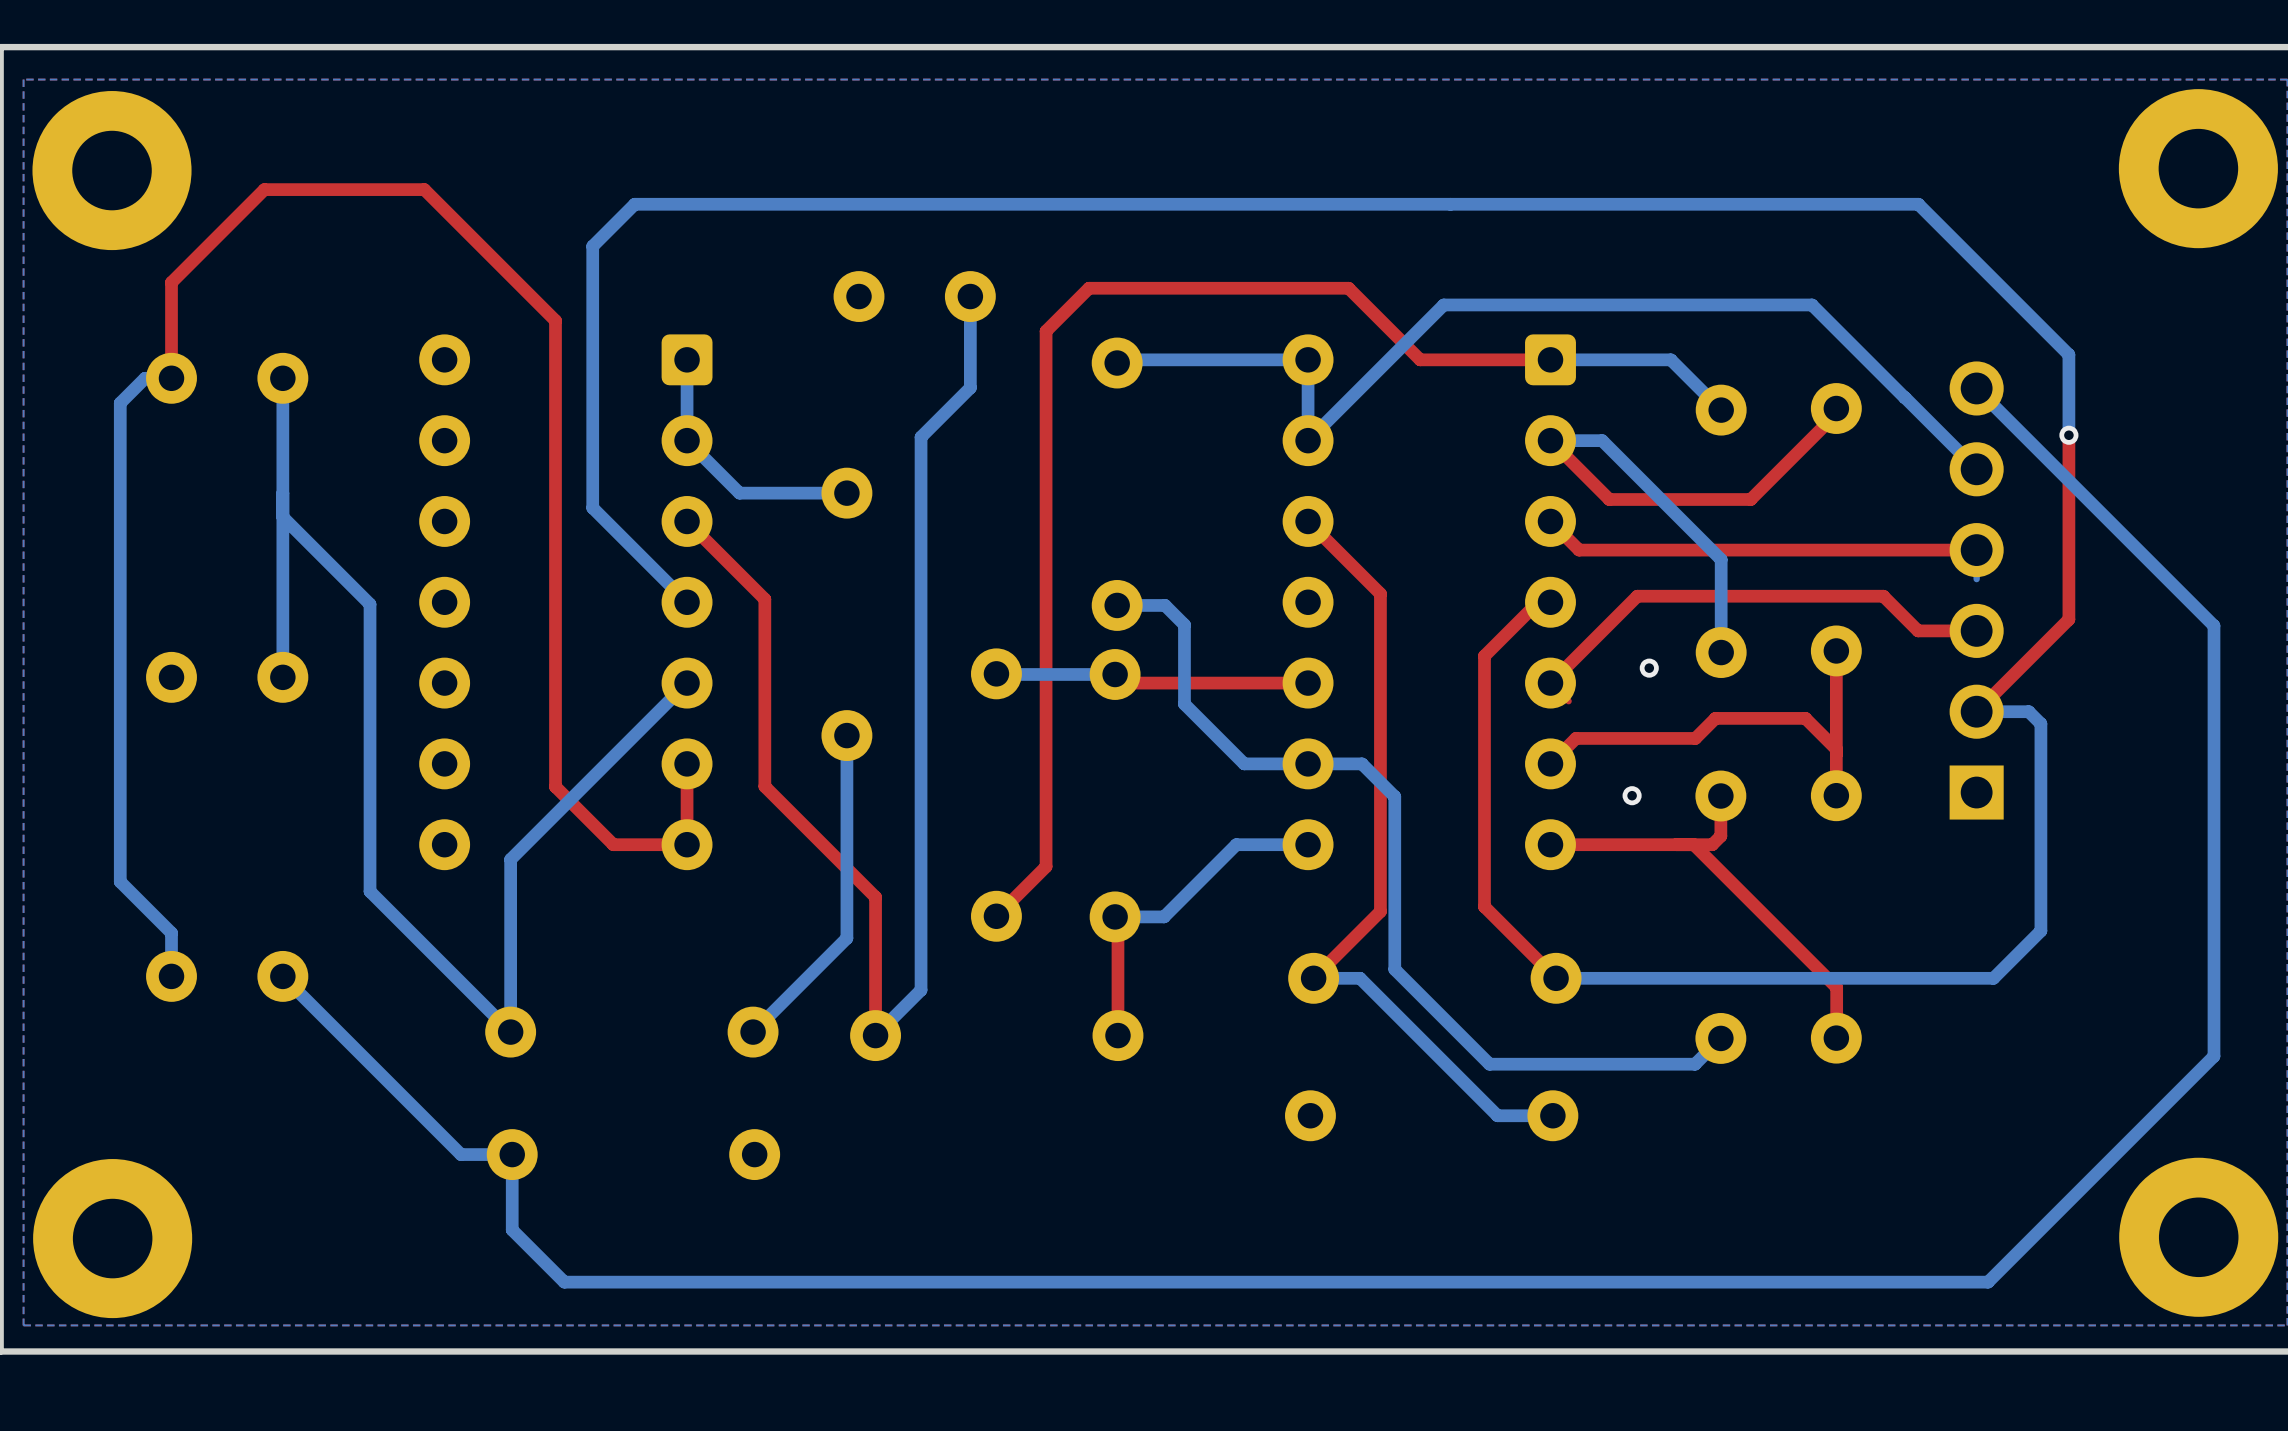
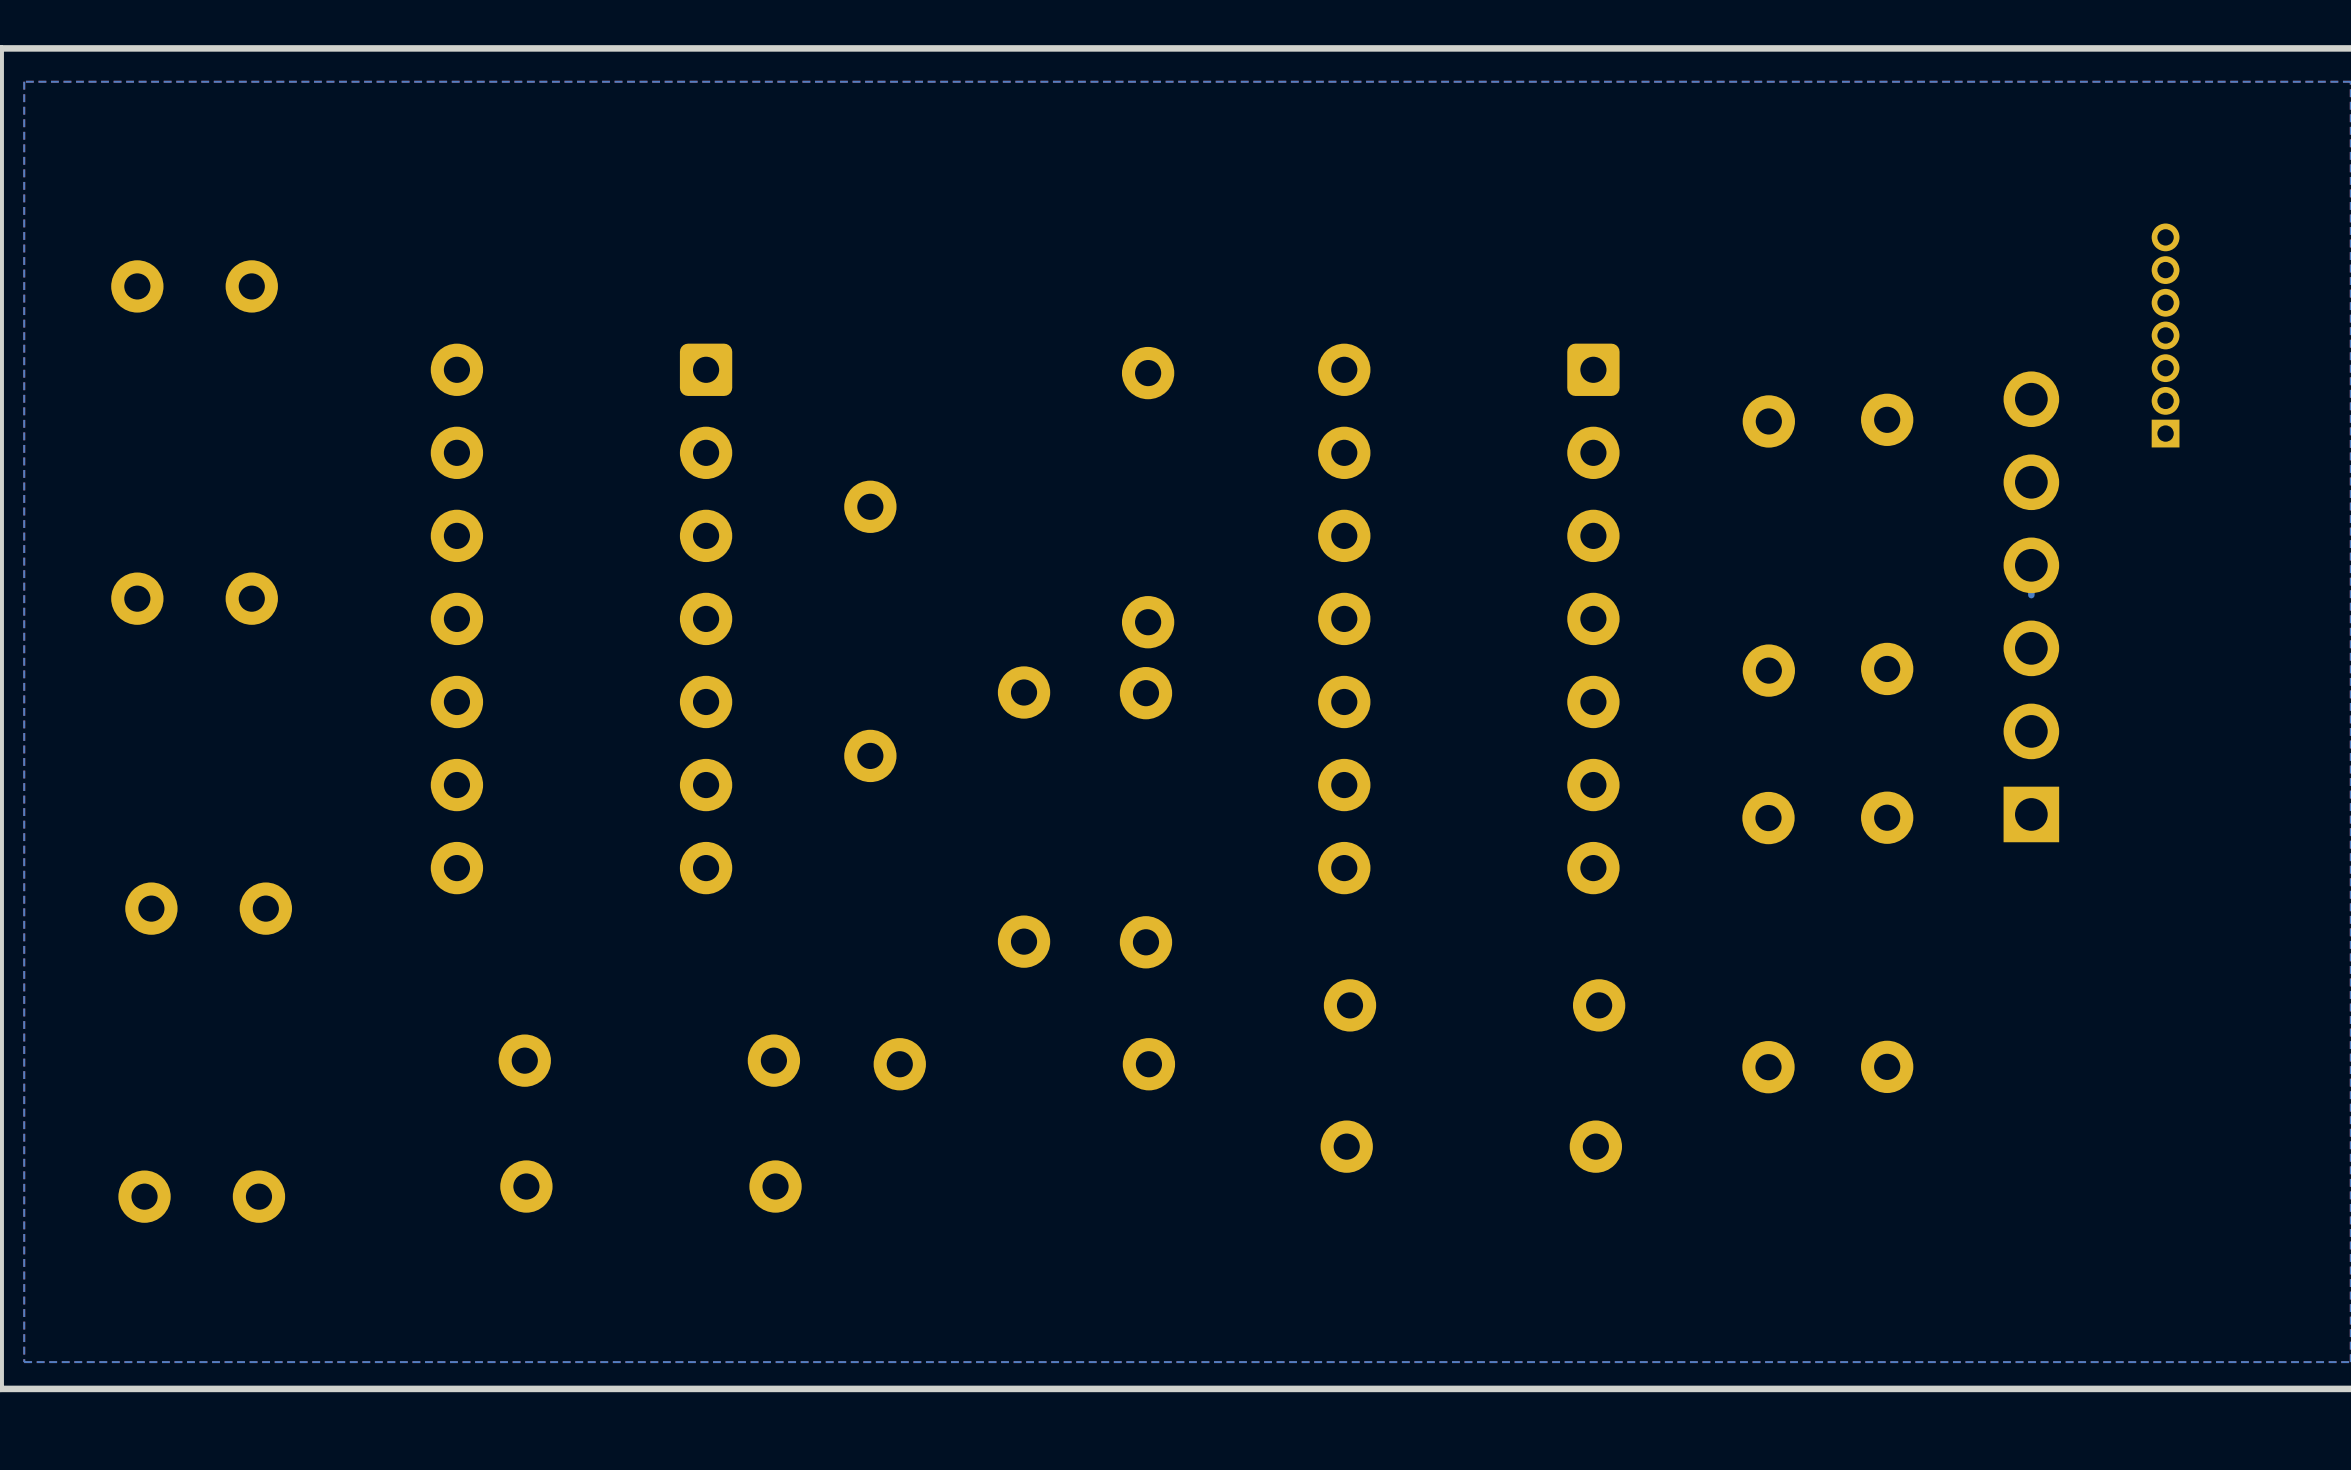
part: (2198, 168) -> none
part: (112, 170) -> none
part: none -> (194, 286)
part: (914, 296) -> none
bottom track: (970, 296) (970, 387) (921, 437) (921, 990) (875, 1035) -> none
part: none -> (2165, 335)
bottom track: (687, 359) (687, 440) (739, 493) (846, 493) -> none
top track: (1550, 359) (1420, 359) (1348, 288) (1089, 288) (1046, 331) (1046, 866) (996, 916) -> none
bottom track: (1550, 359) (1670, 359) (1721, 410) -> none
bottom track: (1117, 363) (1120, 359) (1308, 359) (1308, 440) (1443, 304) (1812, 304) (1904, 397) -> none
top track: (171, 378) (171, 282) (264, 189) (424, 189) (555, 320) (555, 786) (613, 844) (687, 844) (687, 763) -> none
bottom track: (171, 378) (145, 378) (120, 403) (120, 881) (171, 933) (171, 976) -> none
part: (227, 378) -> none
bottom track: (282, 378) (282, 677) -> none
bottom track: (1976, 388) (2213, 625) (2213, 1056) (1988, 1282) (564, 1282) (512, 1229) (512, 1154) (461, 1154) (282, 976) -> none
bottom track: (1905, 397) (1976, 469) -> none
top track: (1840, 409) (1750, 499) (1609, 499) (1550, 440) -> none
top track: (2068, 435) (2068, 619) (1976, 711) -> none
bottom track: (2068, 435) (2068, 354) (1918, 204) (634, 204) (592, 246) (592, 507) (687, 602) -> none
via: (2068, 435) -> none
bottom track: (1550, 440) (1602, 440) (1721, 559) (1721, 652) -> none
bottom track: (282, 517) (370, 604) (370, 891) (510, 1032) (510, 859) (687, 683) -> none
top track: (687, 521) (764, 599) (764, 786) (875, 897) (875, 1035) -> none
top track: (1308, 521) (1380, 593) (1380, 911) (1313, 978) -> none
top track: (1550, 521) (1579, 550) (1976, 550) -> none
top track: (1550, 602) (1538, 602) (1484, 656) (1484, 906) (1556, 978) -> none
bottom track: (1117, 605) (1165, 605) (1184, 624) (1184, 704) (1244, 763) (1361, 763) (1394, 796) (1394, 969) (1489, 1064) (1695, 1064) (1724, 1034) -> none
top track: (1976, 630) (1918, 630) (1883, 596) (1637, 596) (1550, 683) (1568, 701) -> none
top track: (1836, 650) (1836, 795) -> none
via: (1649, 668) -> none
bottom track: (996, 673) (1115, 674) -> none
top track: (1115, 674) (1123, 683) (1308, 683) -> none
part position: (227, 677) -> (194, 598)
bottom track: (1976, 711) (2028, 711) (2040, 723) (2040, 930) (1993, 978) (1556, 978) -> none
bottom track: (846, 735) (846, 938) (753, 1032) -> none
top track: (1836, 749) (1805, 718) (1715, 718) (1695, 738) (1575, 738) (1550, 763) -> none
via: (1632, 795) -> none
top track: (1720, 796) (1720, 836) (1712, 844) (1550, 844) -> none
bottom track: (1308, 844) (1236, 844) (1164, 916) (1115, 916) -> none
top track: (1693, 844) (1836, 987) (1836, 1038) -> none
part: none -> (208, 908)
top track: (1115, 916) (1117, 919) (1117, 1035) -> none
part: (227, 976) -> none
bottom track: (1313, 978) (1360, 978) (1497, 1115) (1552, 1115) -> none
part: none -> (201, 1196)
part: (2198, 1237) -> none
part: (112, 1238) -> none

